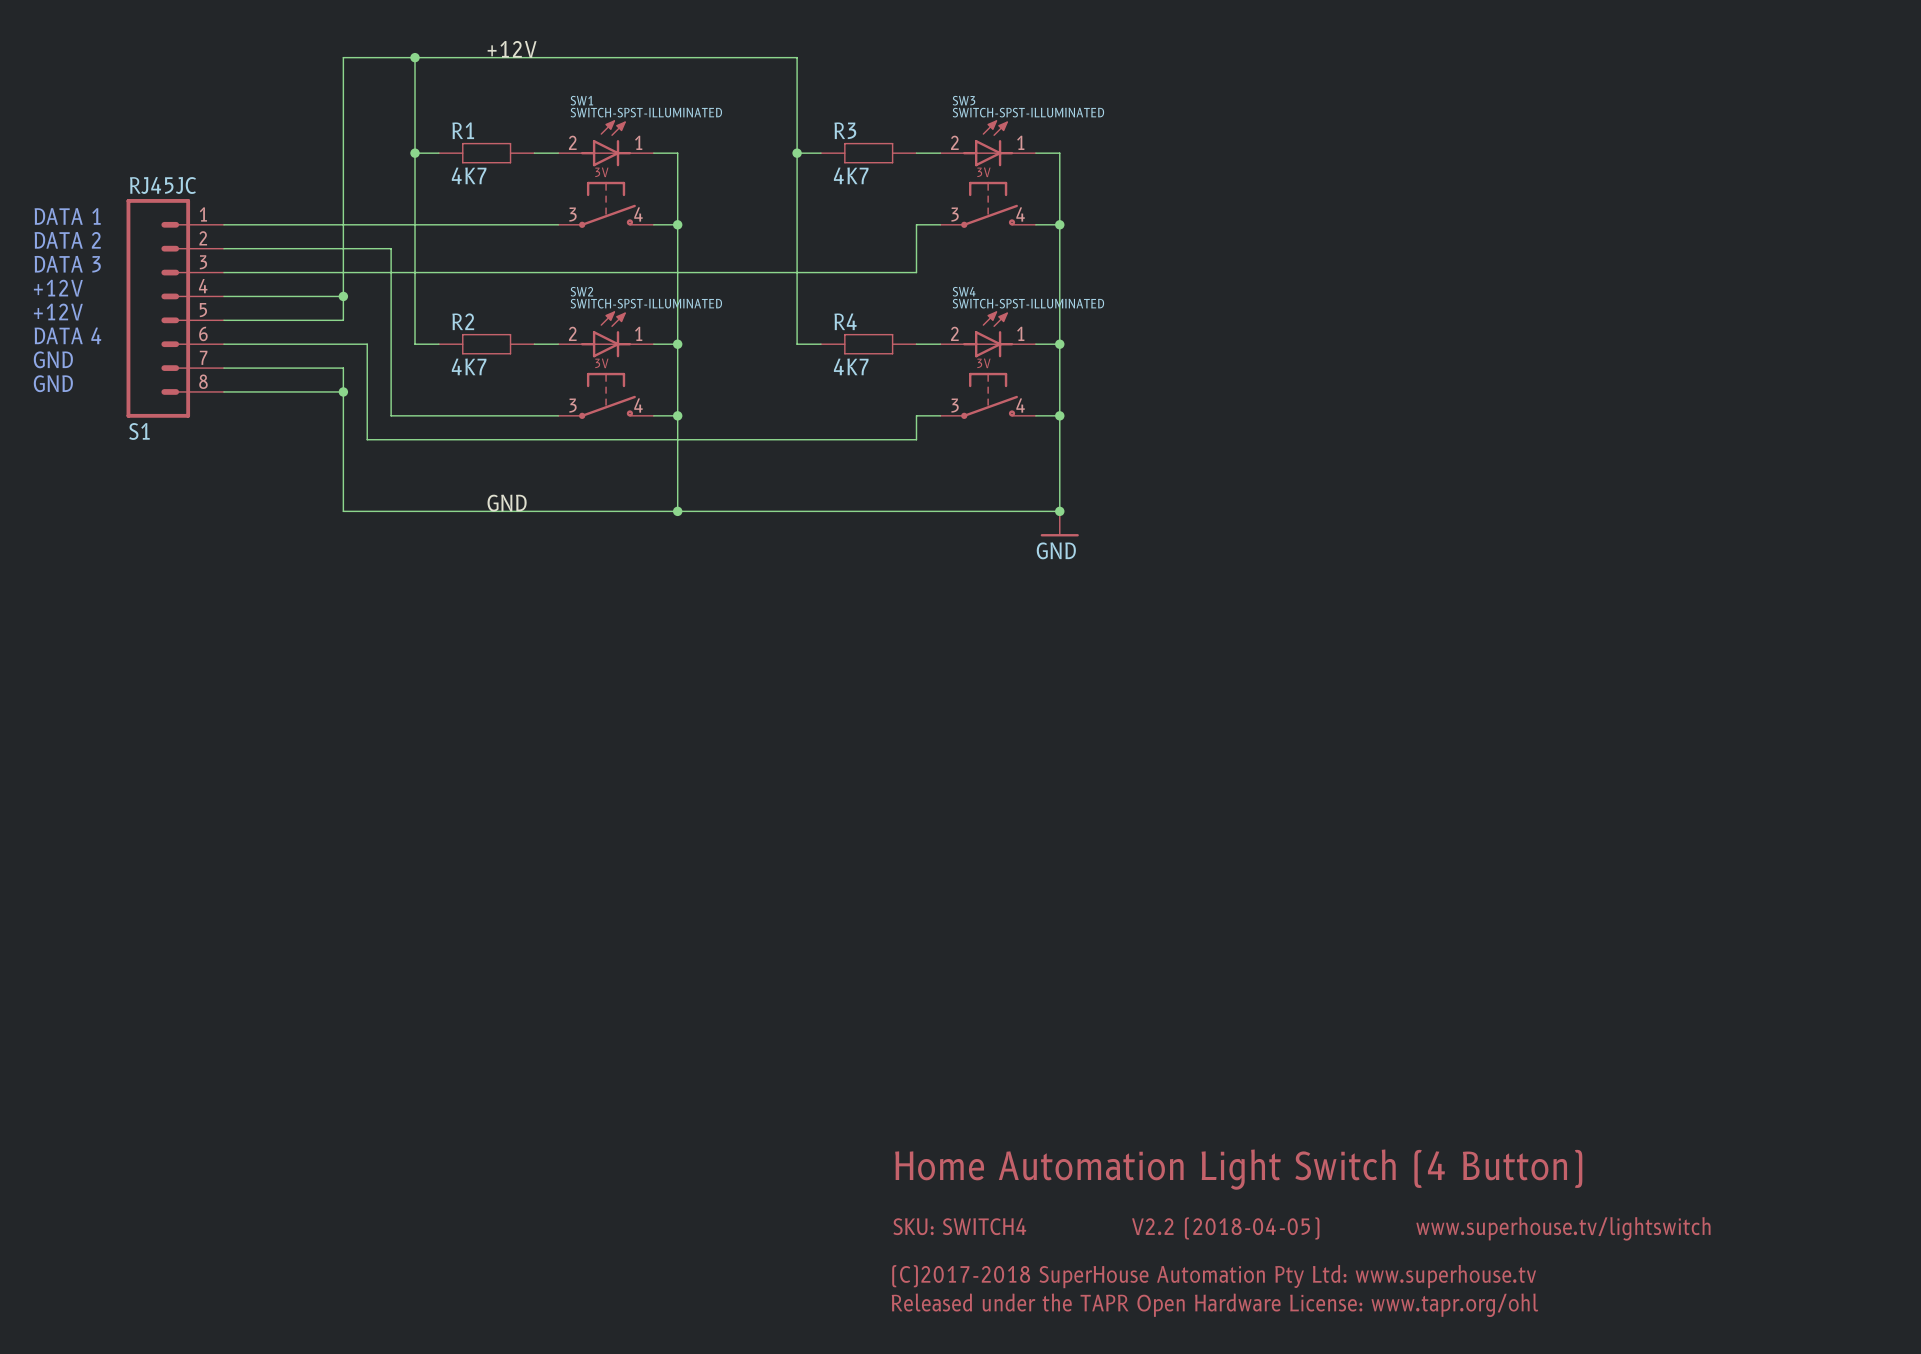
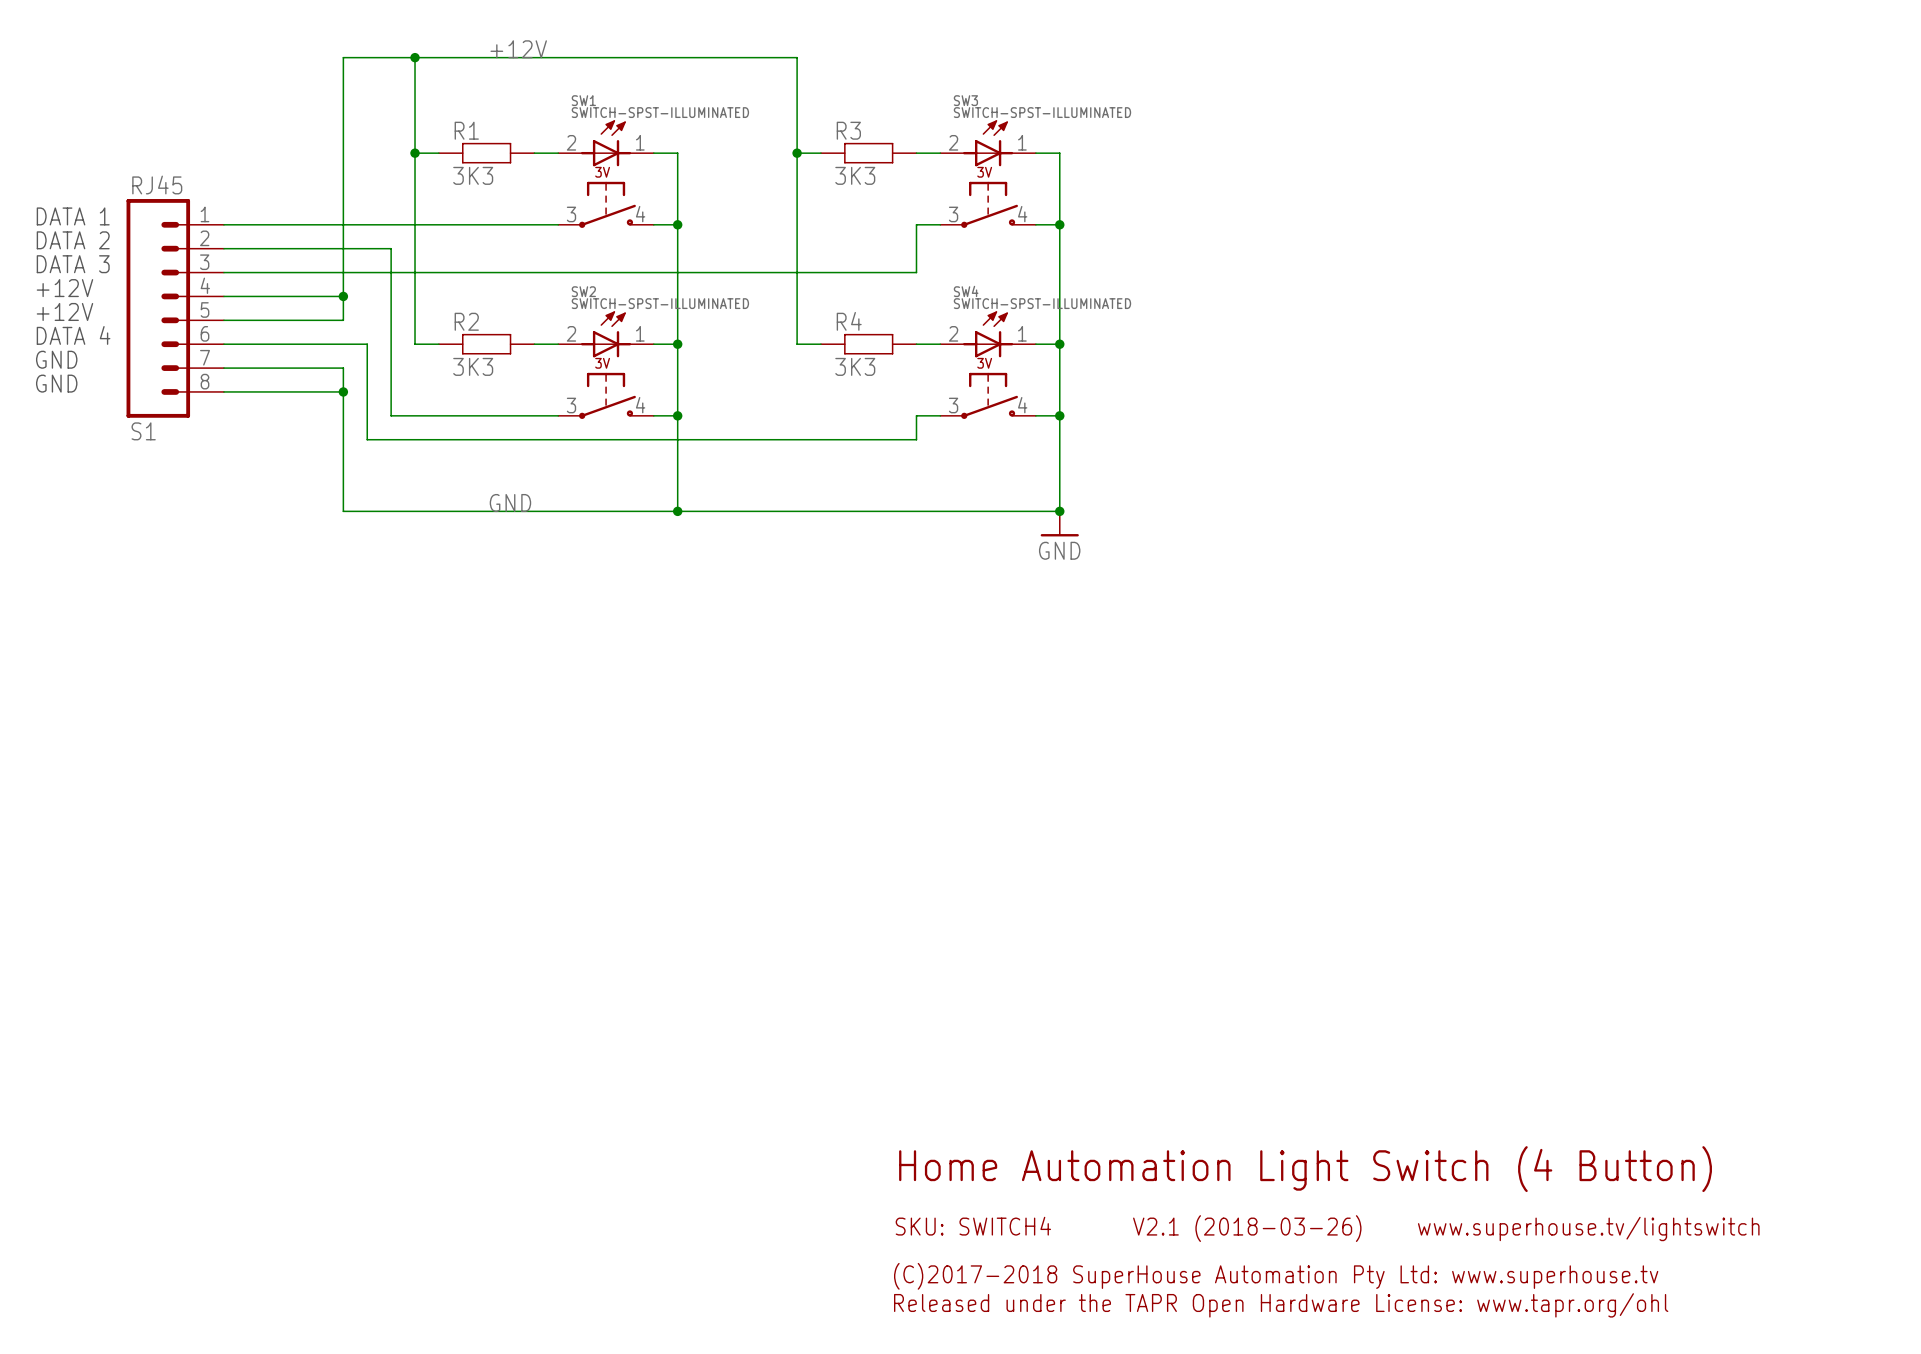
R1 value: 4K7 (469, 175) -> 3K3 (473, 175)
R3 value: 4K7 (851, 175) -> 3K3 (855, 175)
S1 value: RJ45JC (162, 185) -> RJ45 (157, 185)
R2 value: 4K7 (469, 366) -> 3K3 (473, 366)
R4 value: 4K7 (851, 366) -> 3K3 (855, 366)
text: V2.2 (2018-04-05) (1225, 1228) -> V2.1 (2018-03-26) (1247, 1228)

